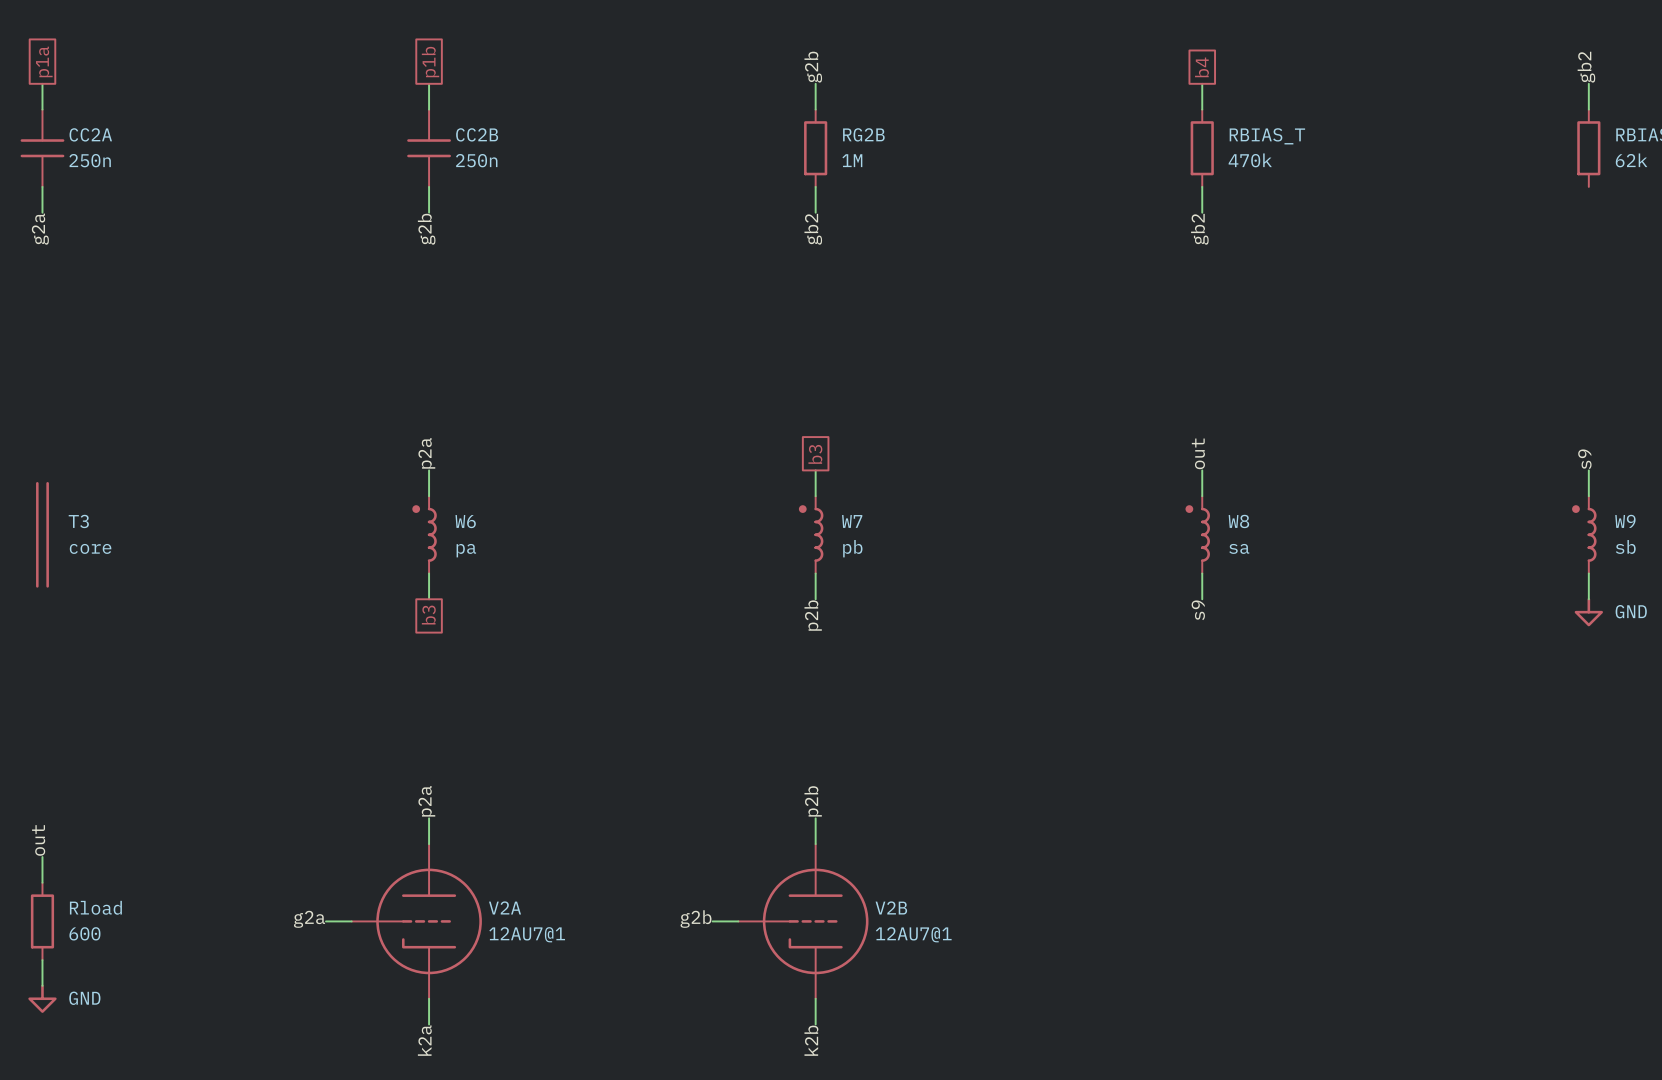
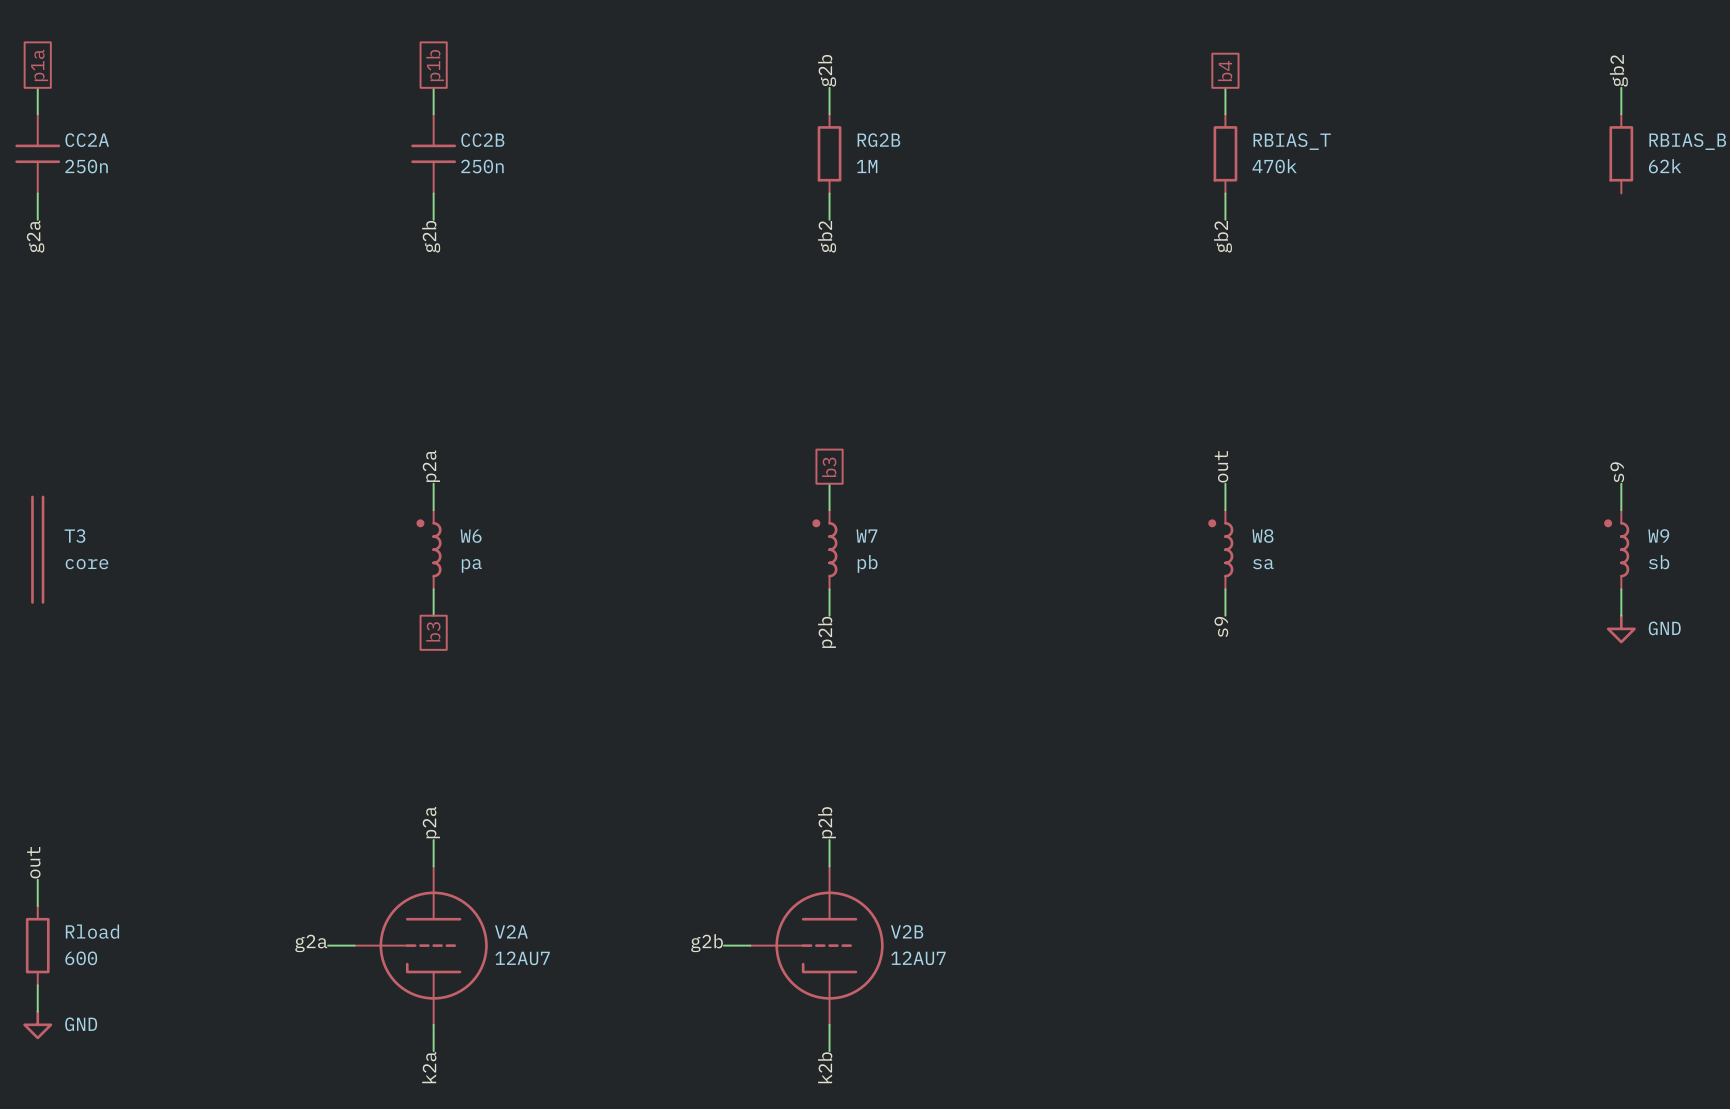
V2A value: 12AU7@1 (527, 934) -> 12AU7 (522, 958)
V2B value: 12AU7@1 (913, 934) -> 12AU7 (918, 958)

